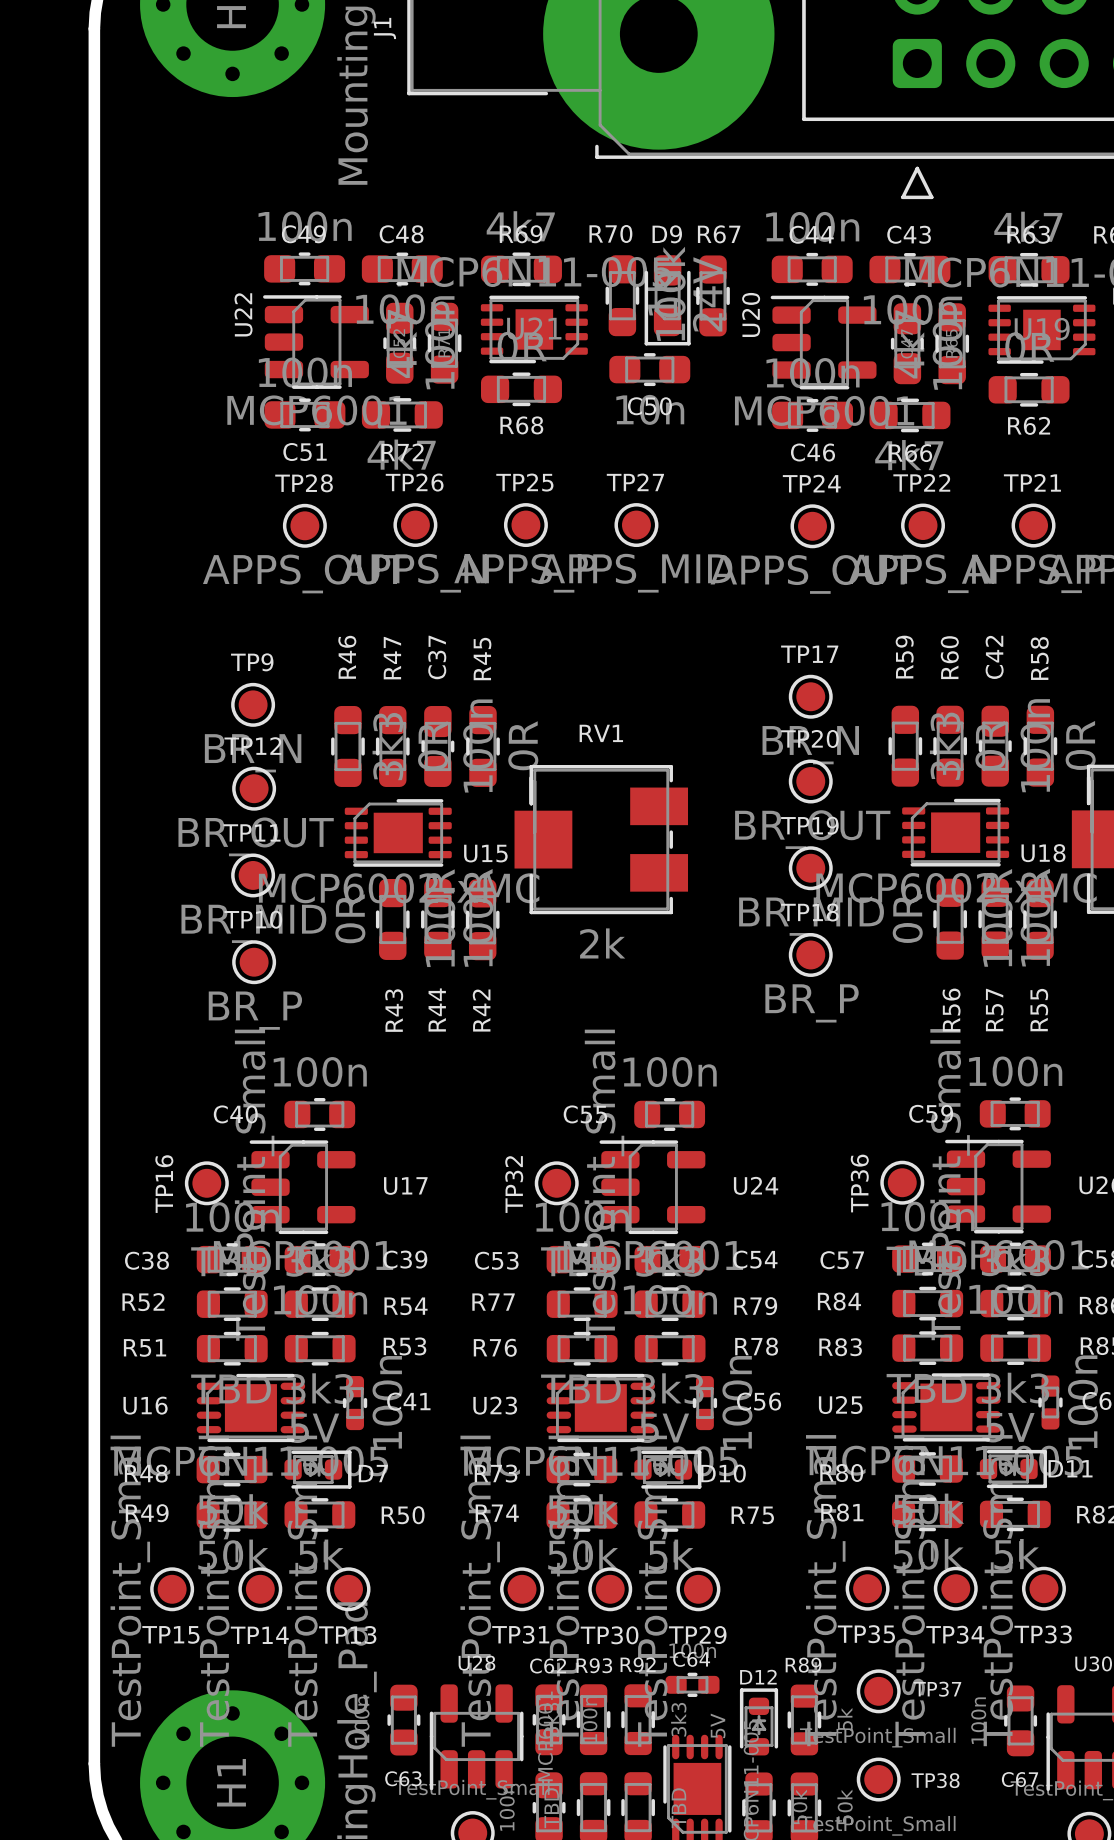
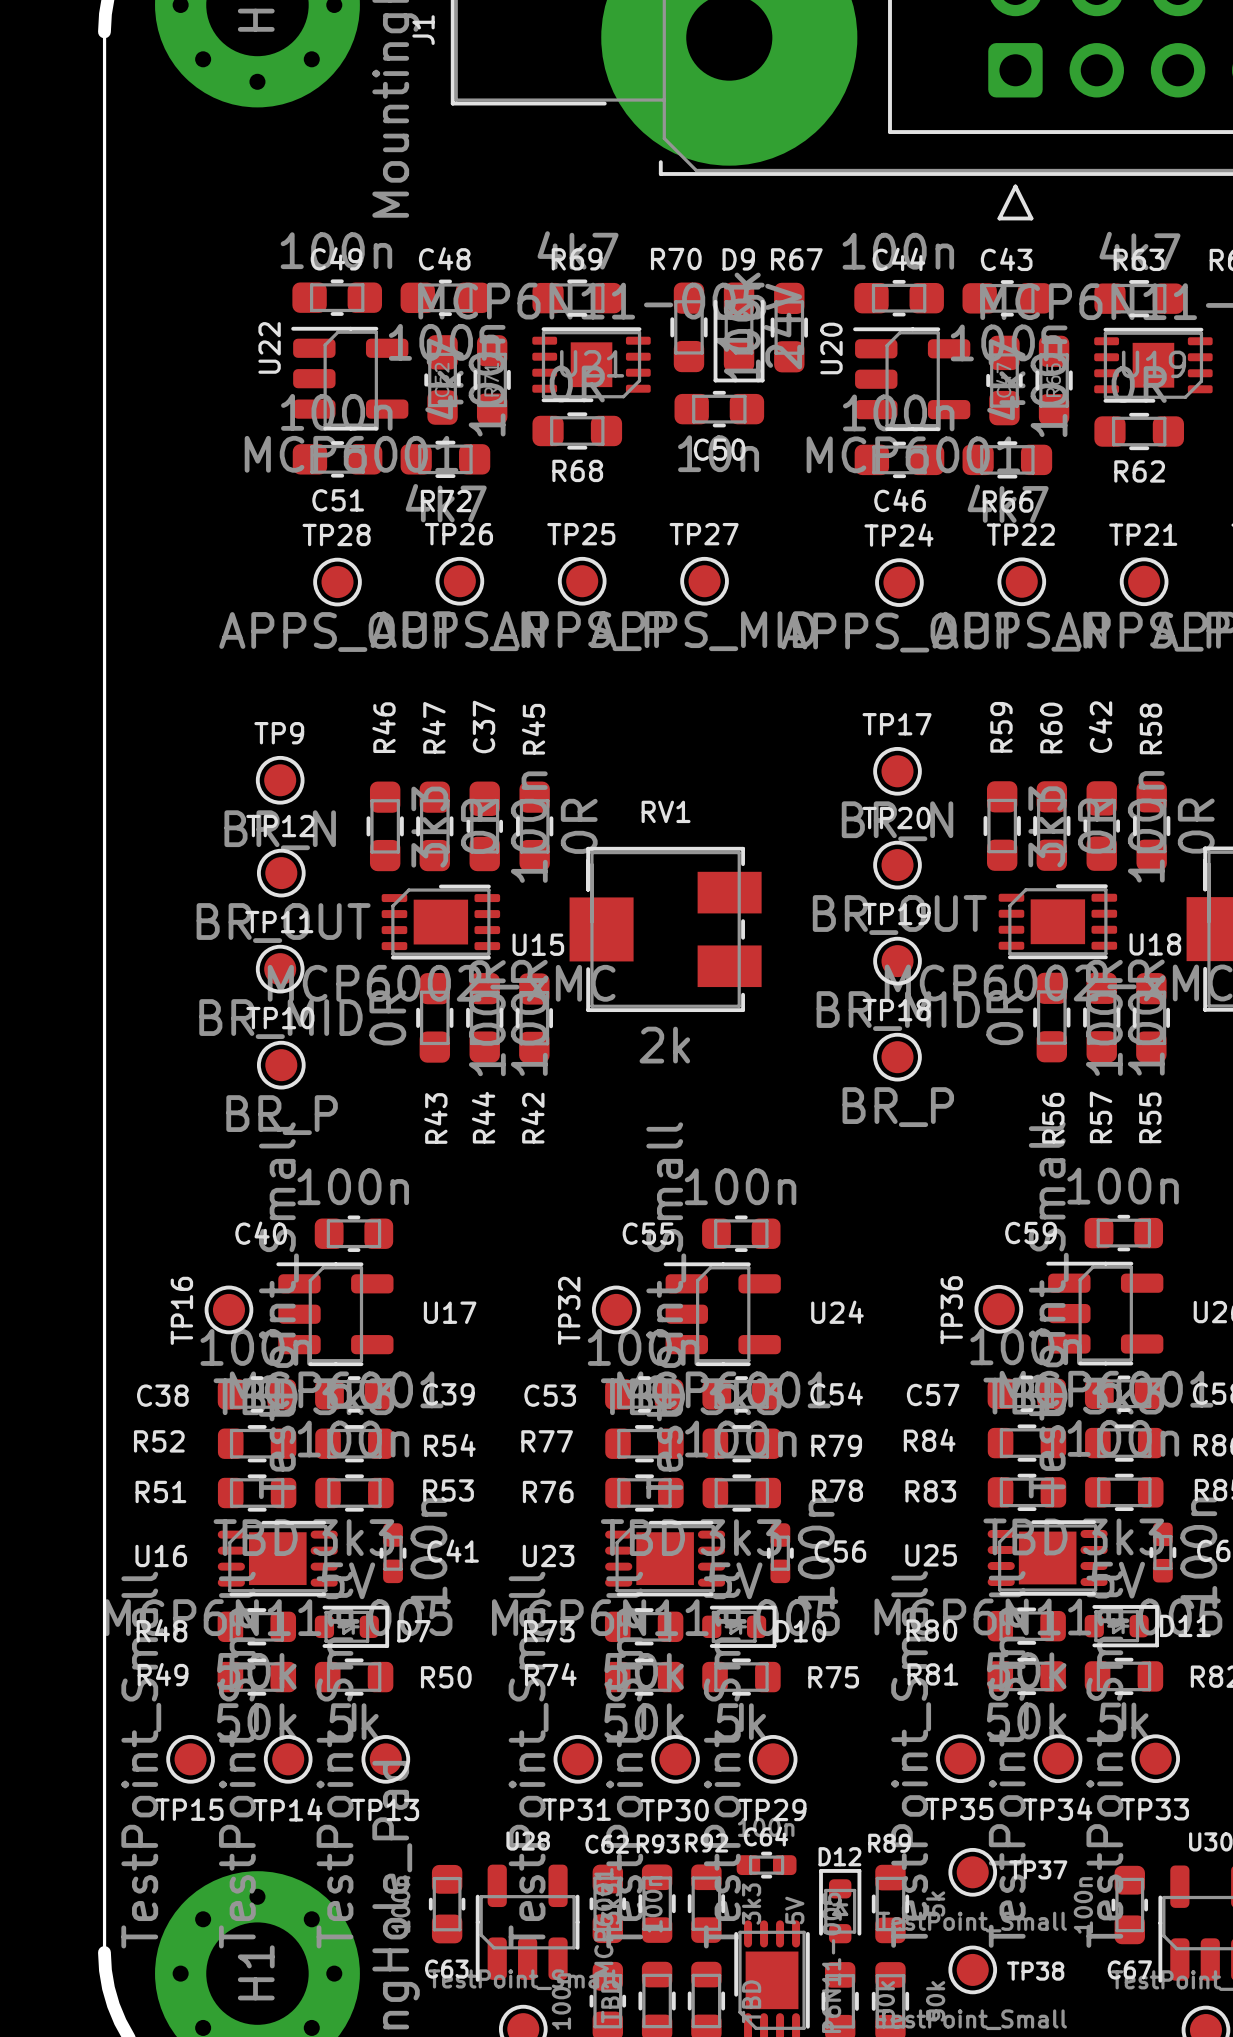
board edge width: thick (94, 28) (94, 1763) -> thin (104, 31) (104, 1952)

